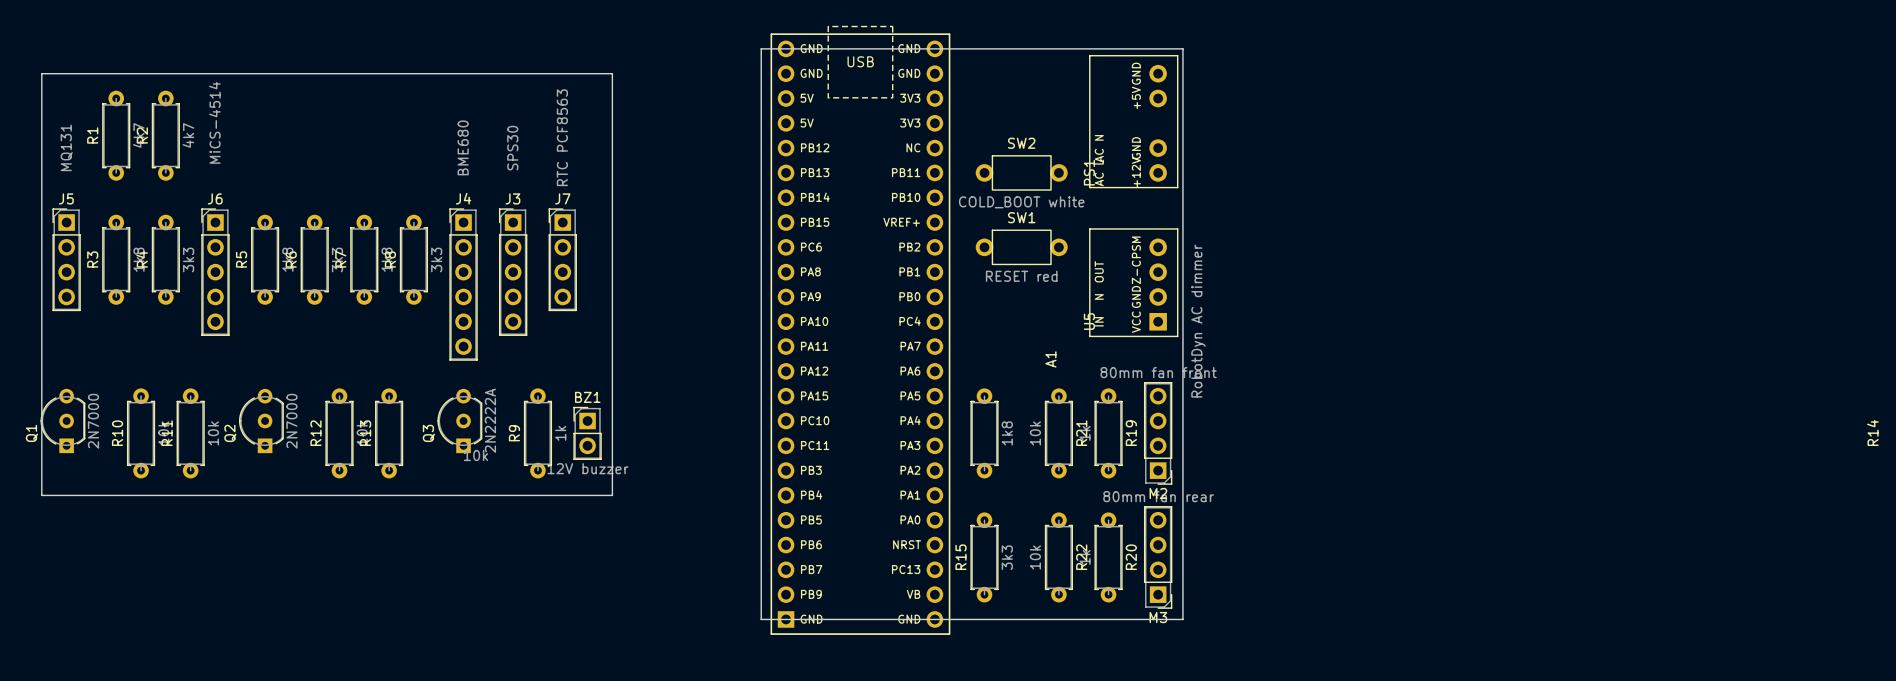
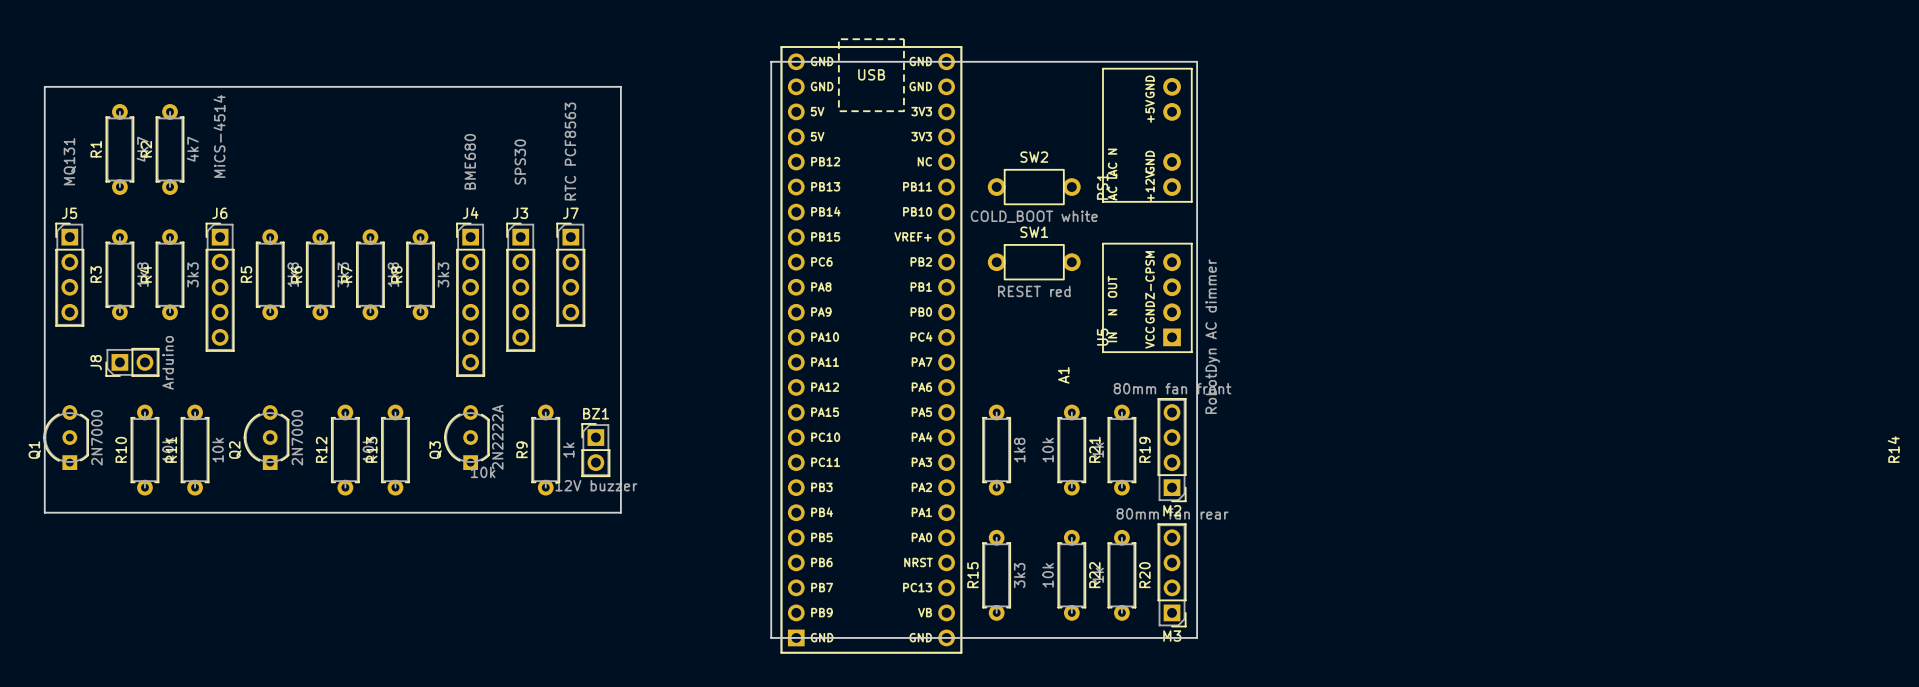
J8: none -> Arduino (132, 362)

